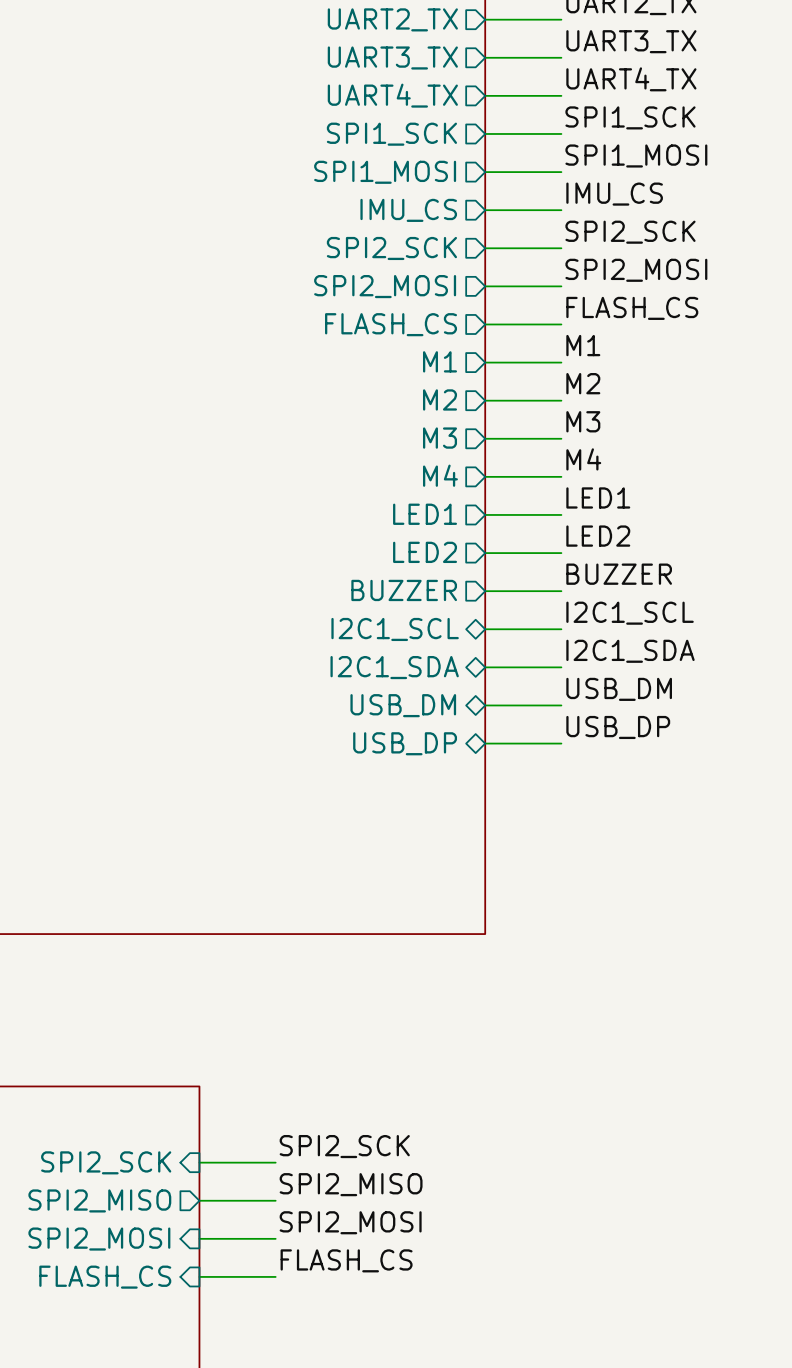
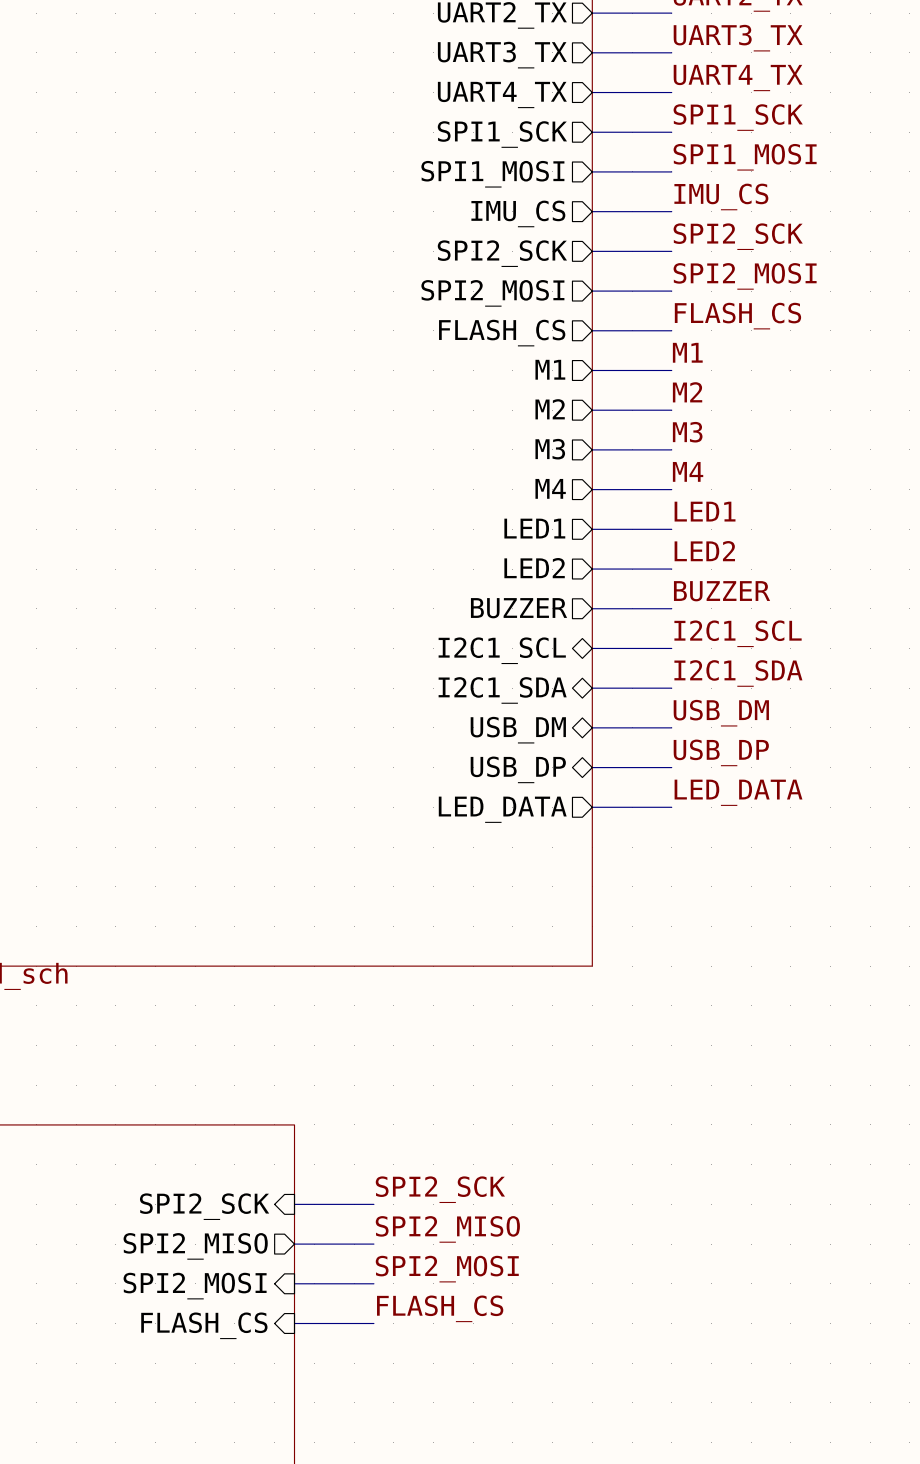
label: none -> LED_DATA (738, 792)
sheet pin: none -> LED_DATA (502, 809)
wire: none -> (592, 807) (671, 807)

